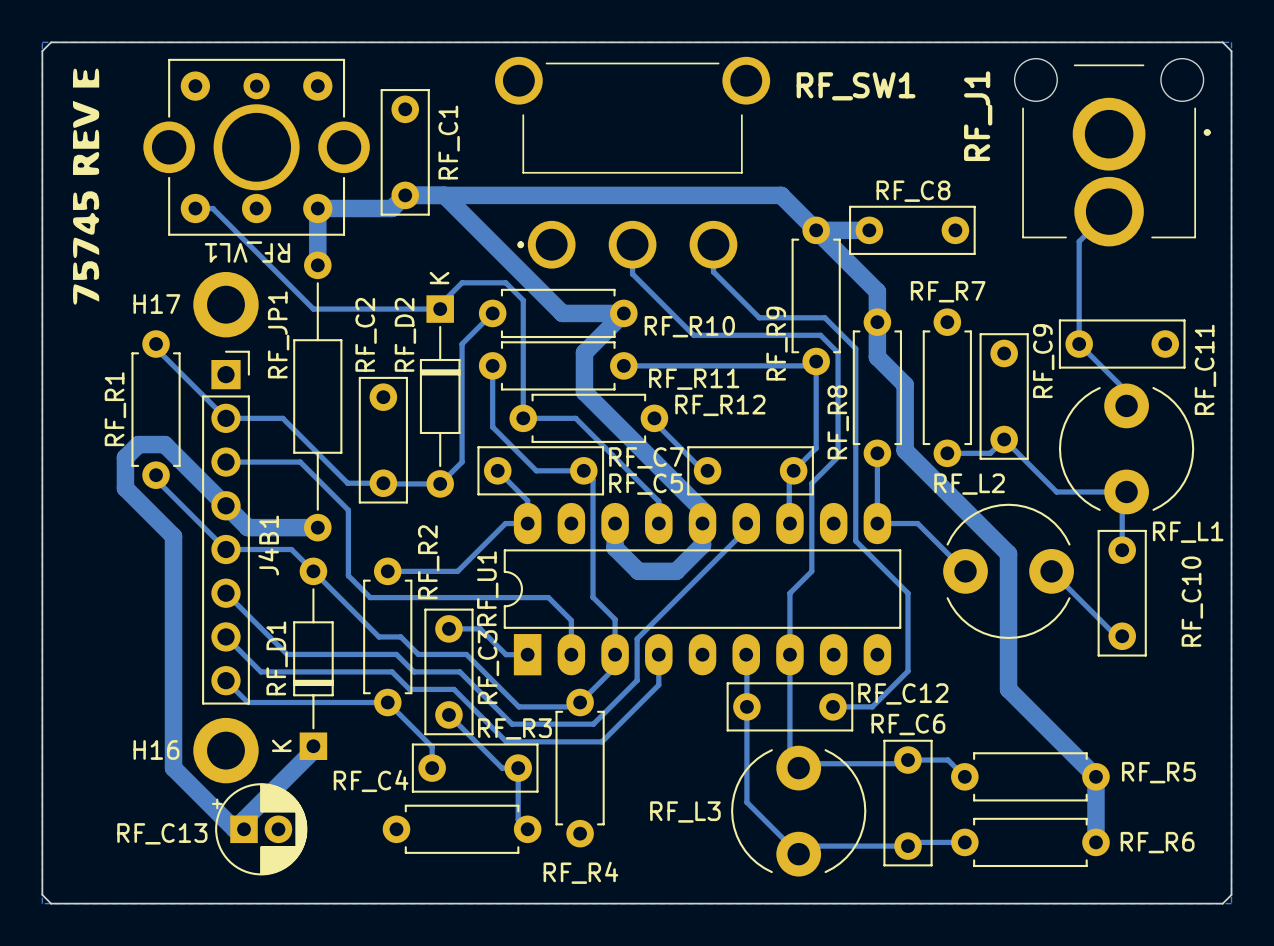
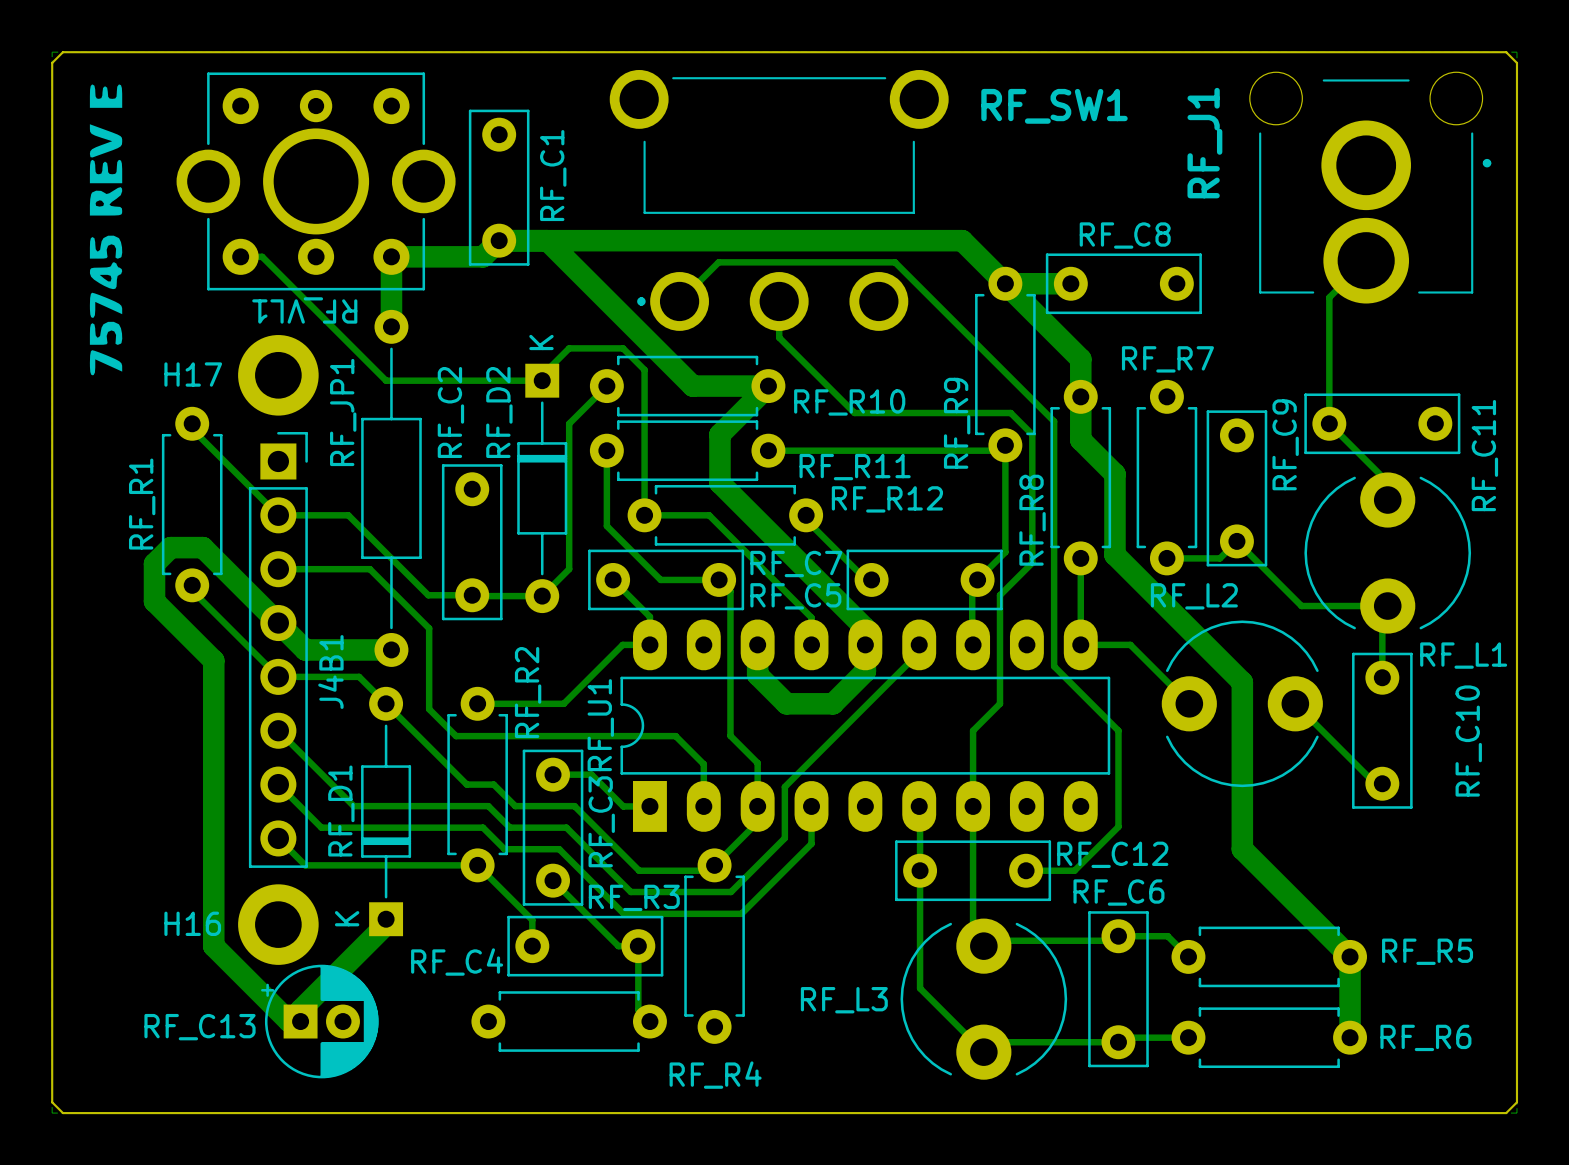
bottom track: (713, 244) (713, 271) (759, 317) (824, 317) (855, 348) -> (679, 301) (718, 262) (895, 262) (1054, 421) (1054, 429)

